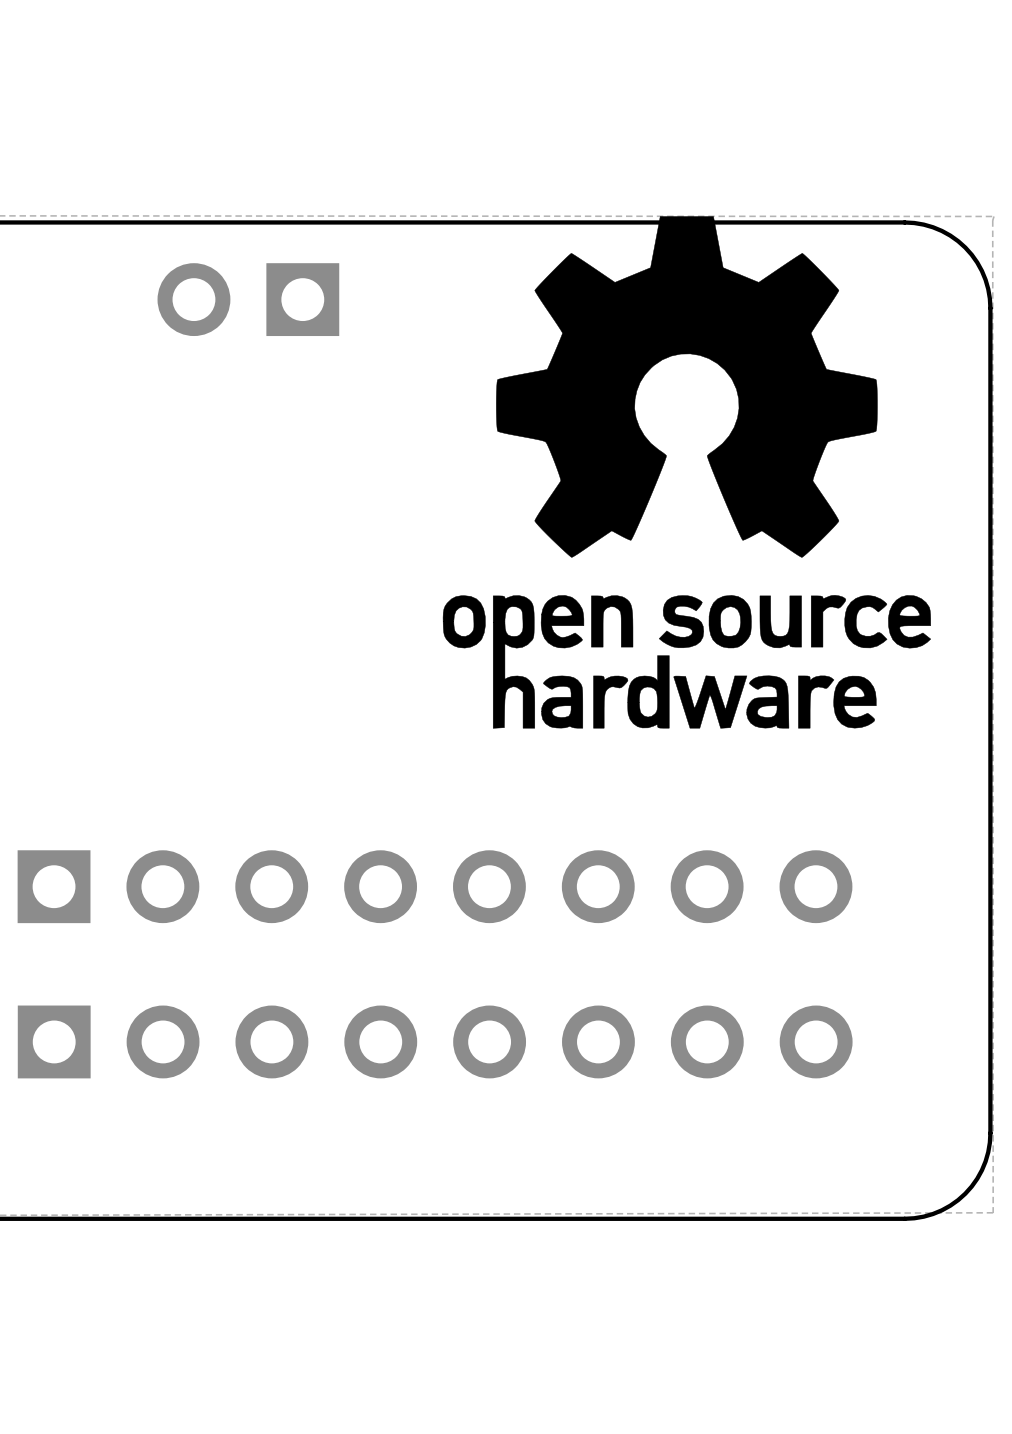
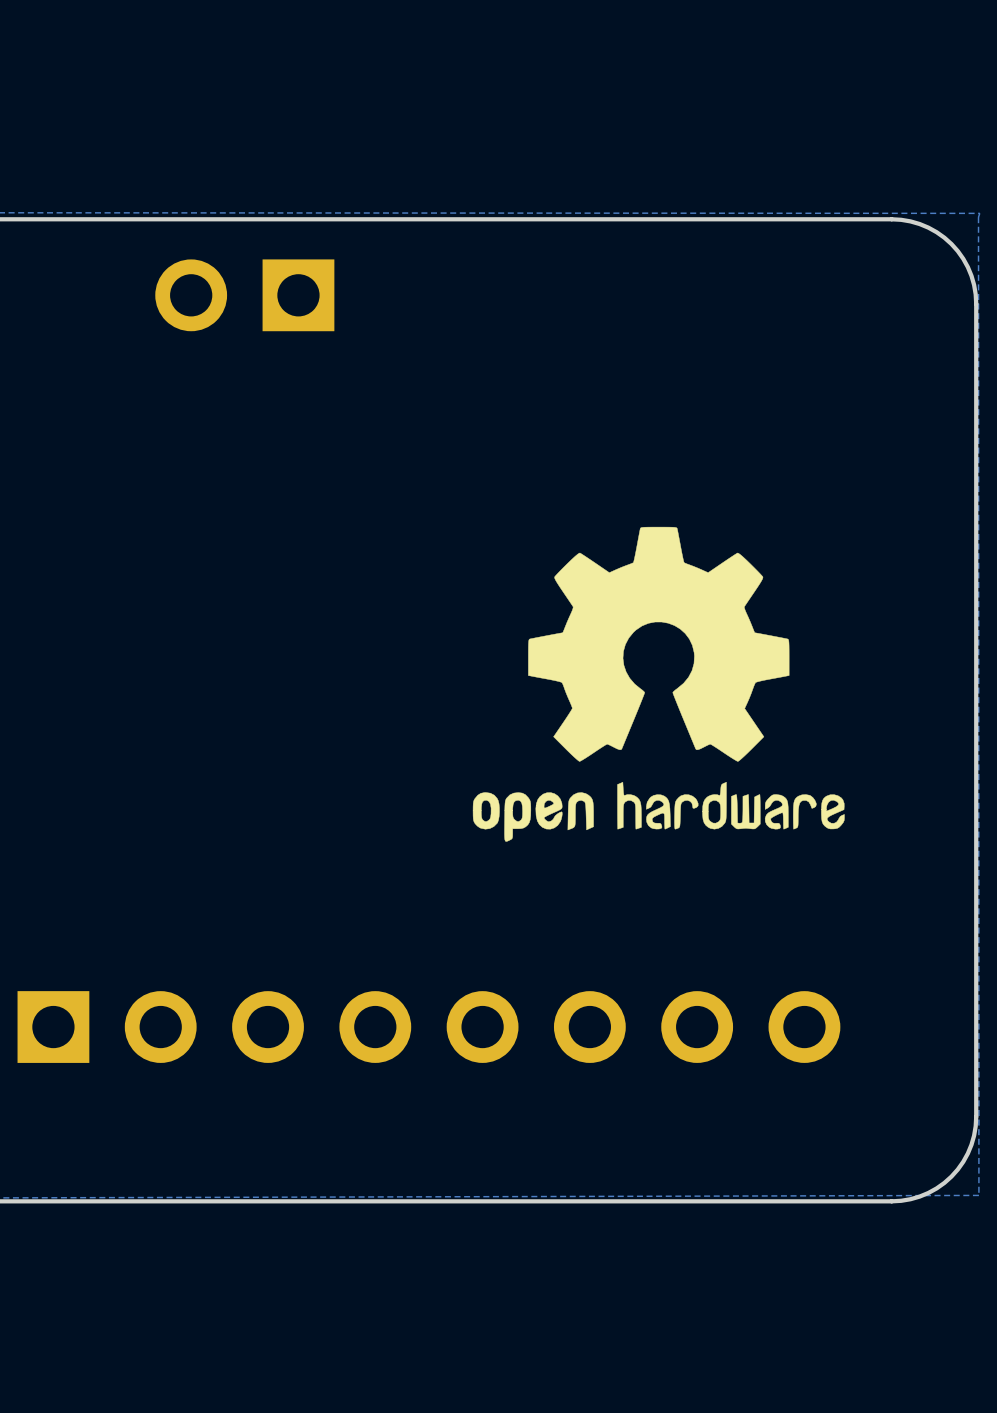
drawing: [442, 216, 932, 729] -> none
drawing: none -> [472, 526, 845, 842]
part: (435, 886) -> none

